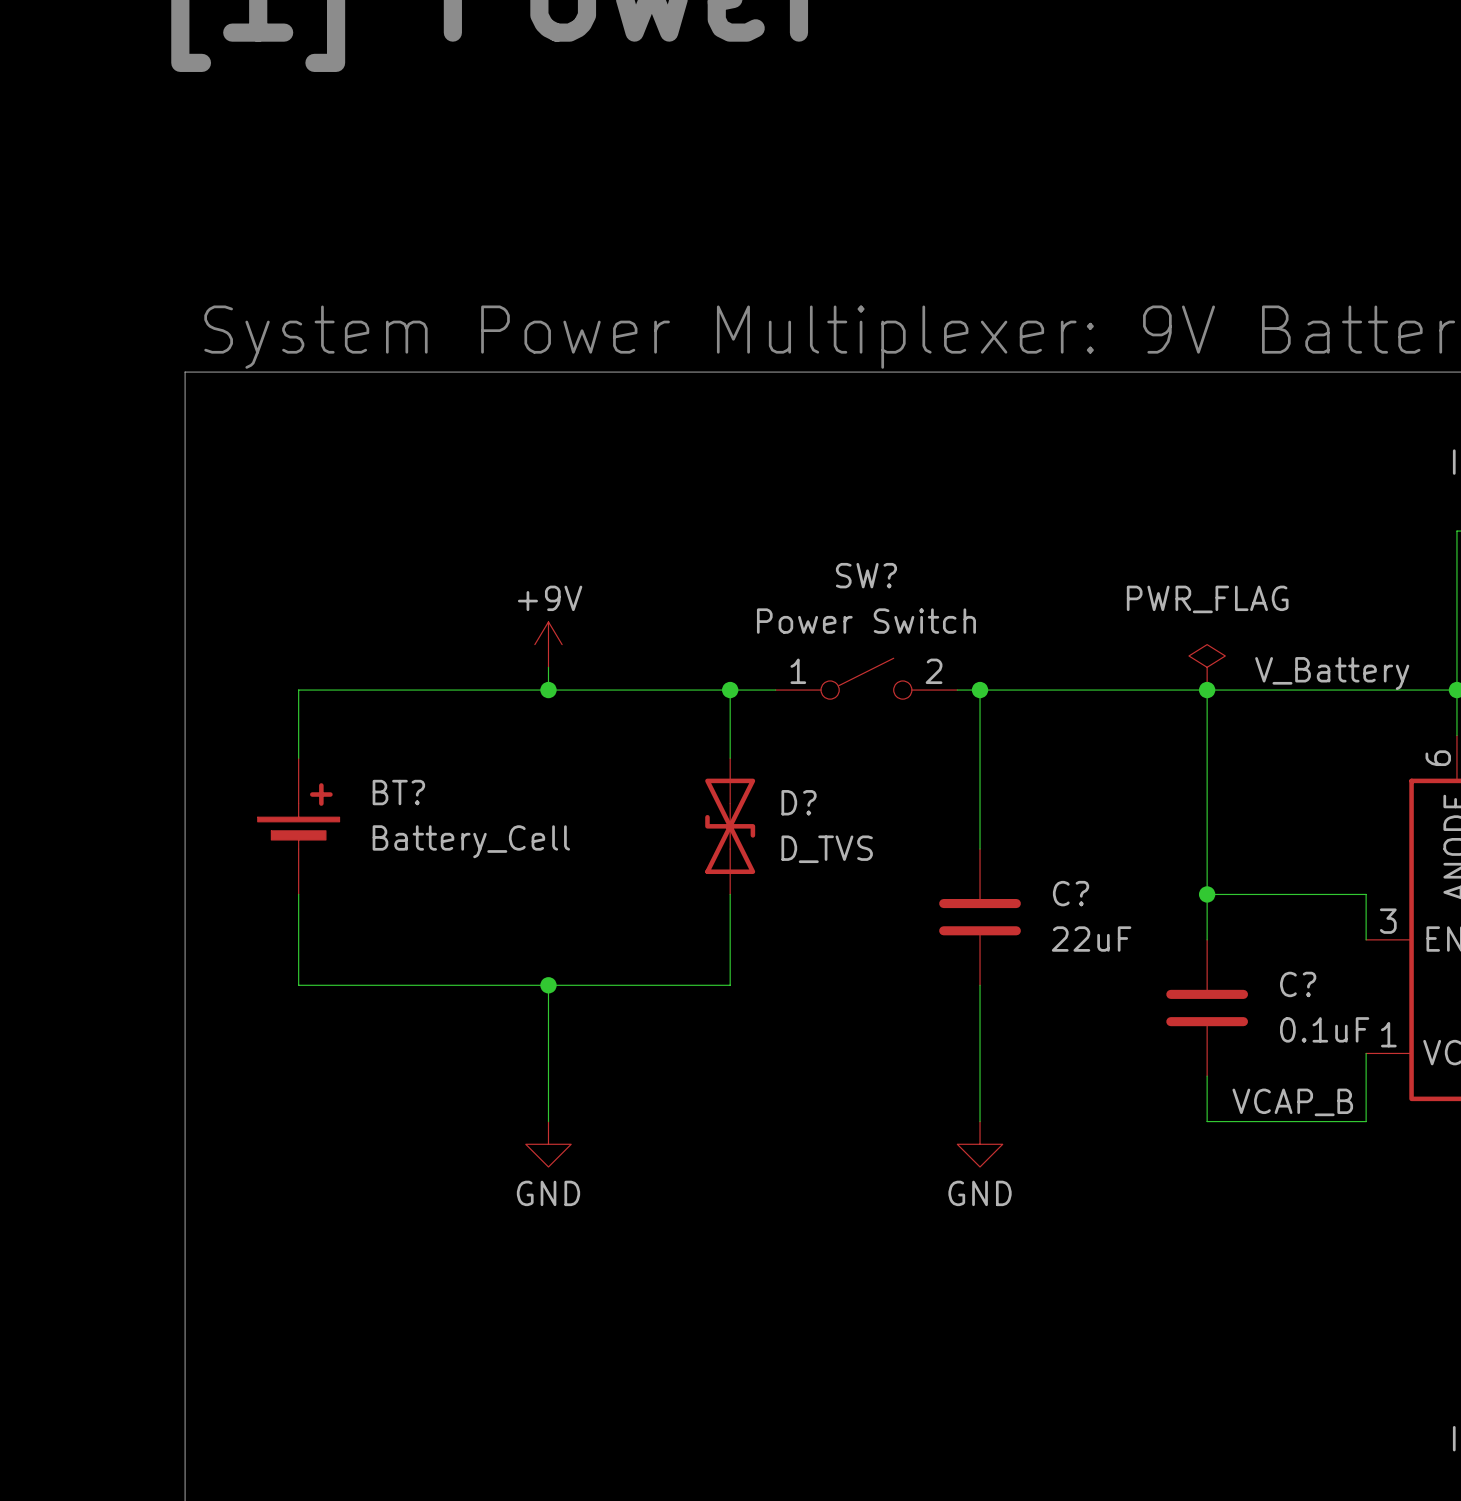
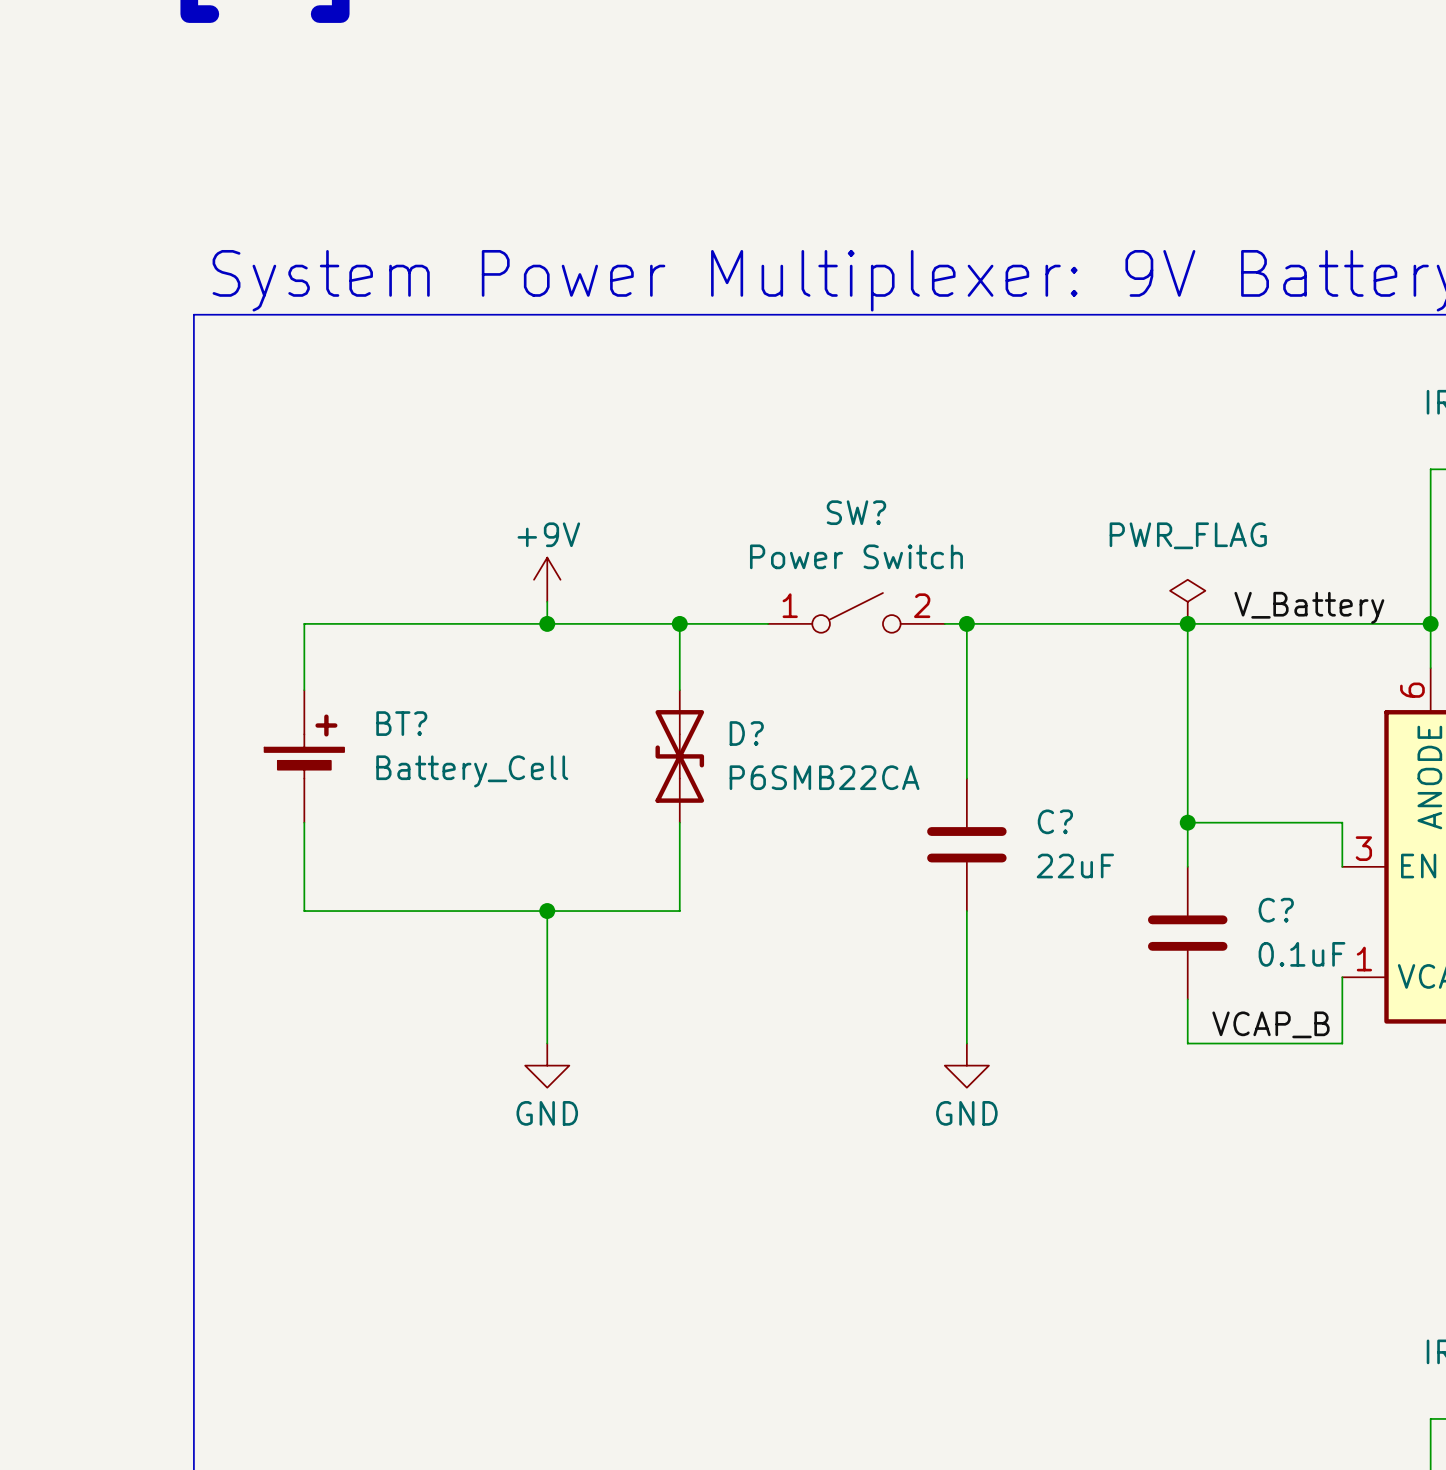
wire: (730, 690) (730, 758) -> (679, 623) (679, 690)
junction position: (730, 690) -> (679, 623)
D?: none -> P6SMB22CA (679, 756)
D?: D_TVS (730, 826) -> none
wire: (730, 894) (730, 985) (684, 985) -> (679, 822) (679, 911)

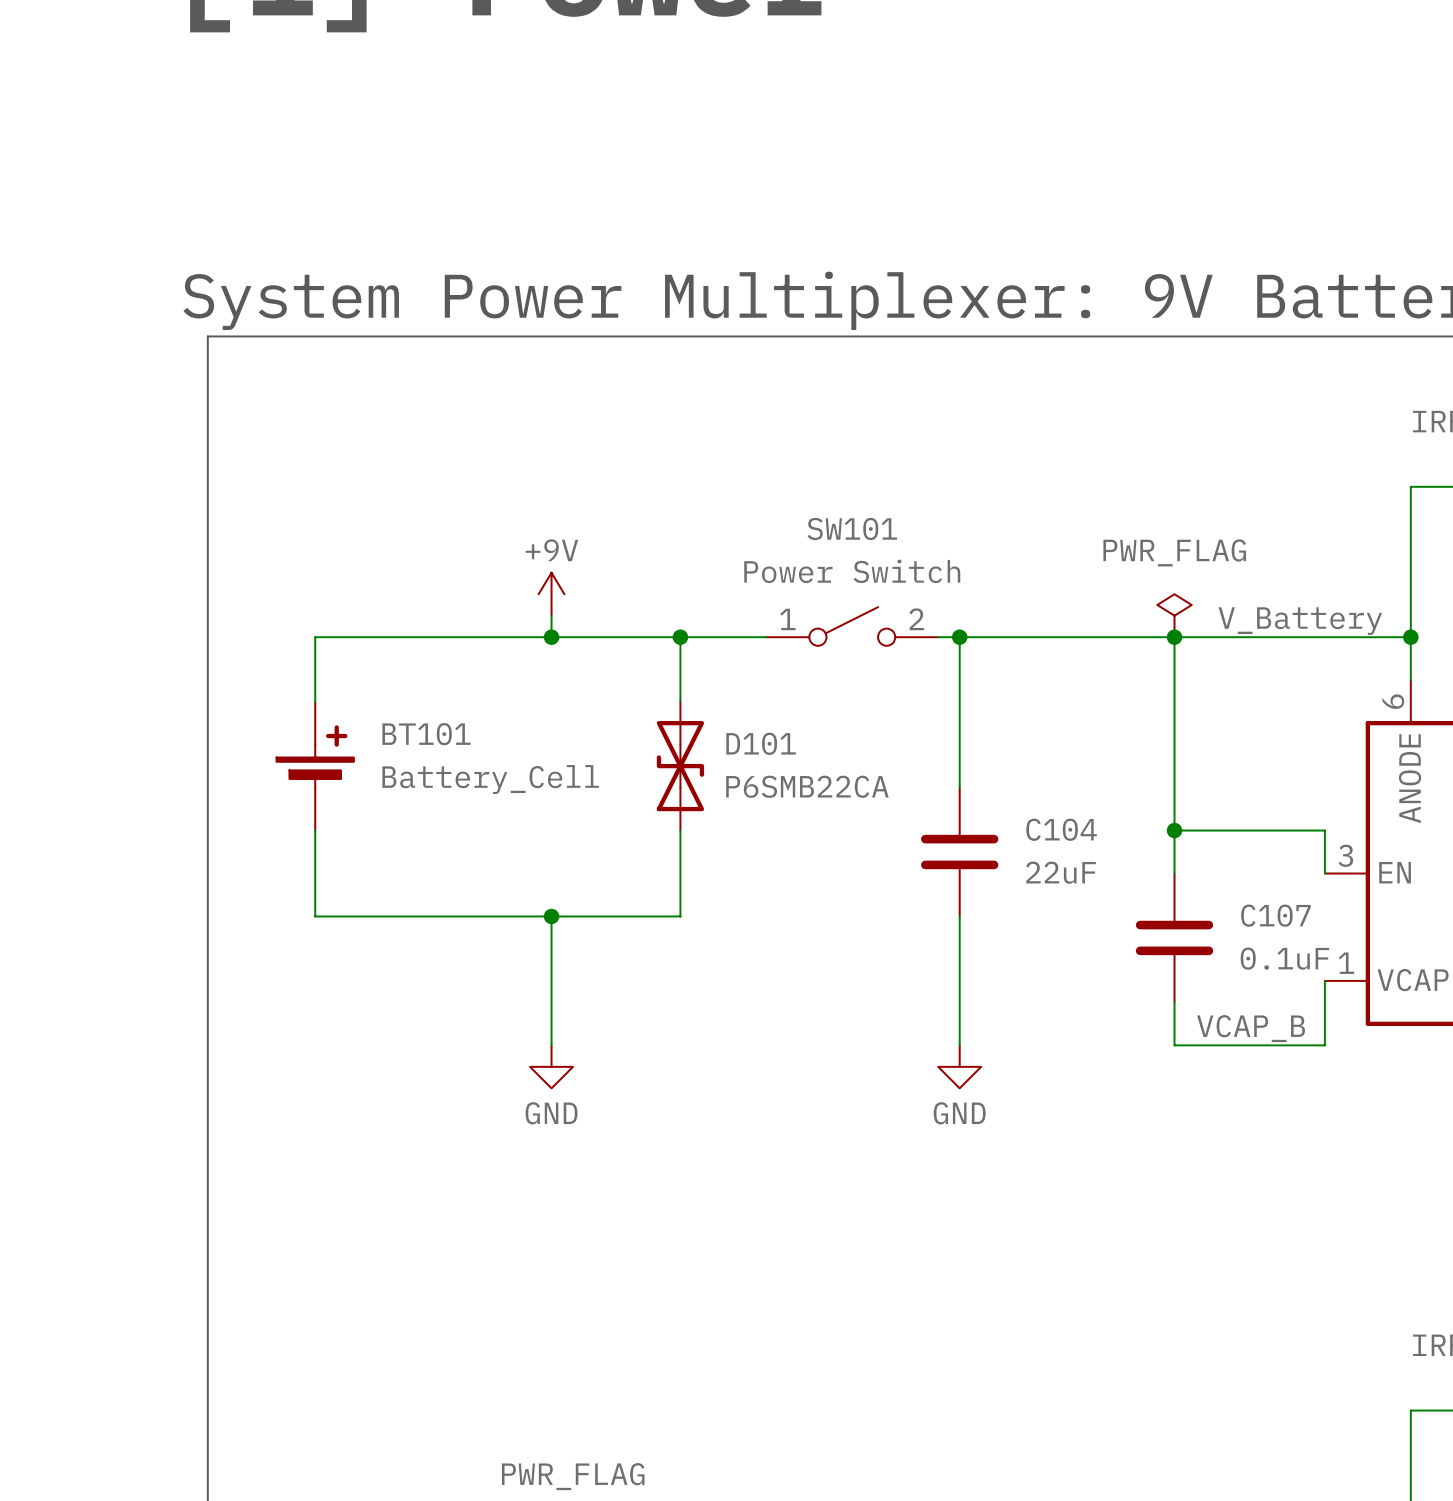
SW? name: SW? (856, 512) -> SW101 (852, 528)
BT? name: BT? (401, 723) -> BT101 (426, 734)
D? name: D? (746, 733) -> D101 (761, 743)
C? name: C? (1055, 821) -> C104 (1061, 829)
C? name: C? (1276, 910) -> C107 (1275, 915)

